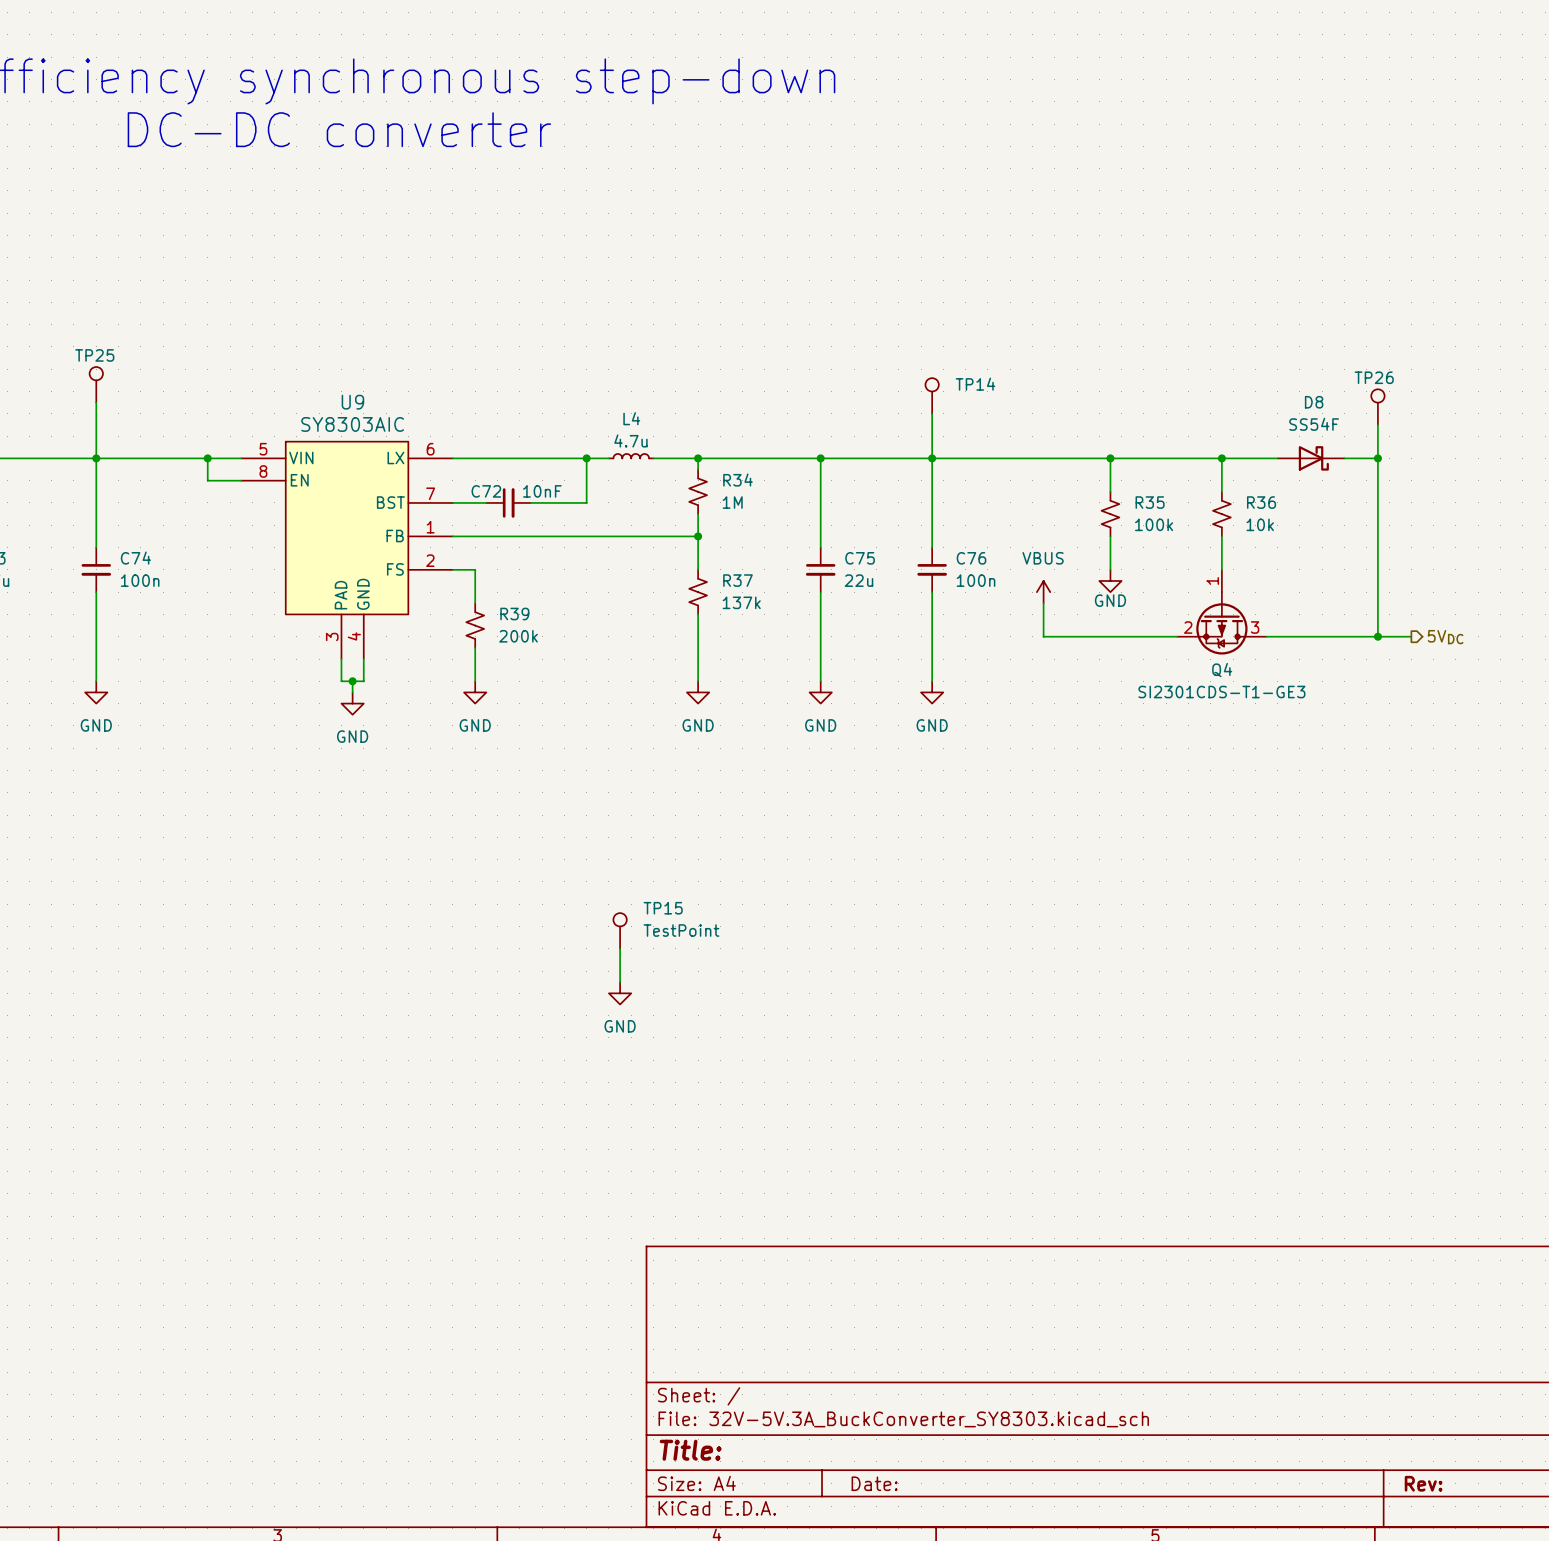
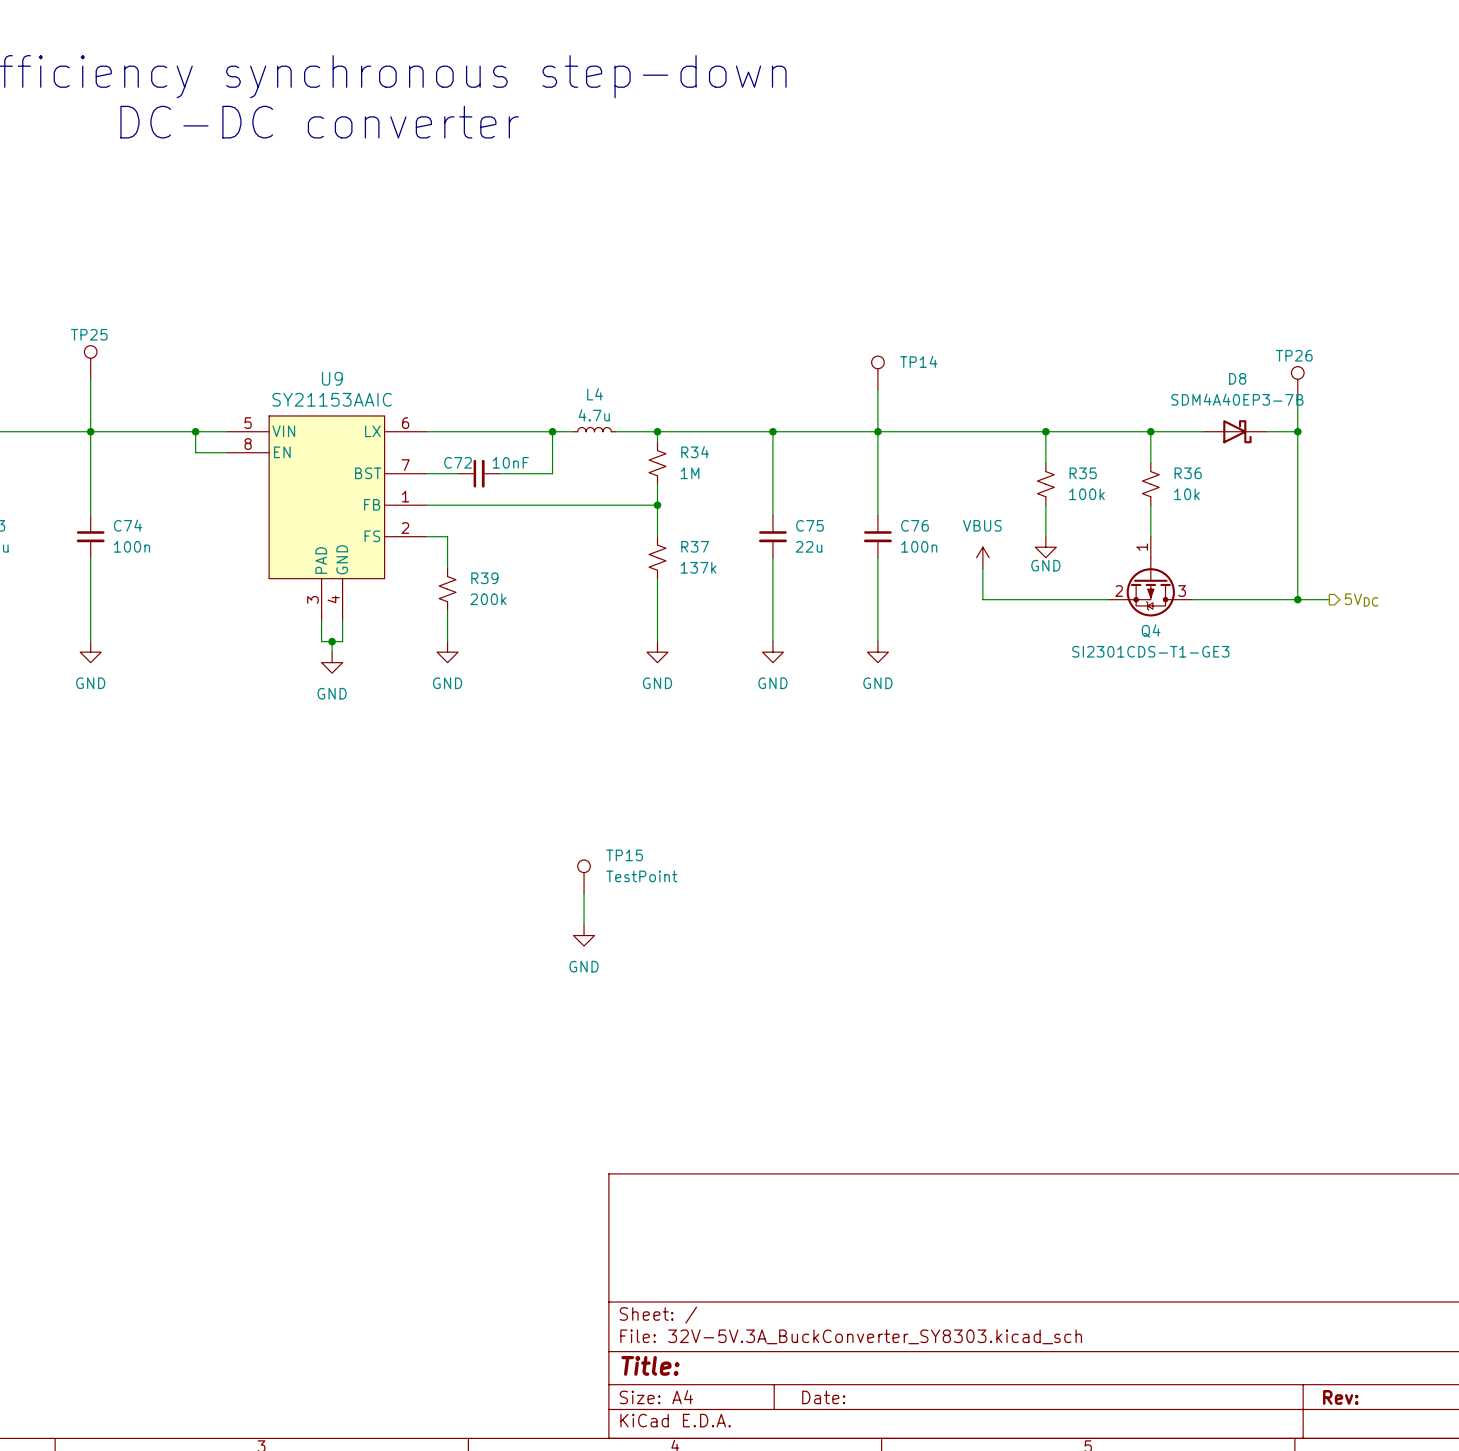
U9 value: SY8303AIC (352, 424) -> SY21153AAIC (332, 399)
D8 value: SS54F (1314, 424) -> SDM4A40EP3-7B (1237, 399)
U9 symbol: [241, 441, 455, 694] -> [227, 415, 427, 621]

